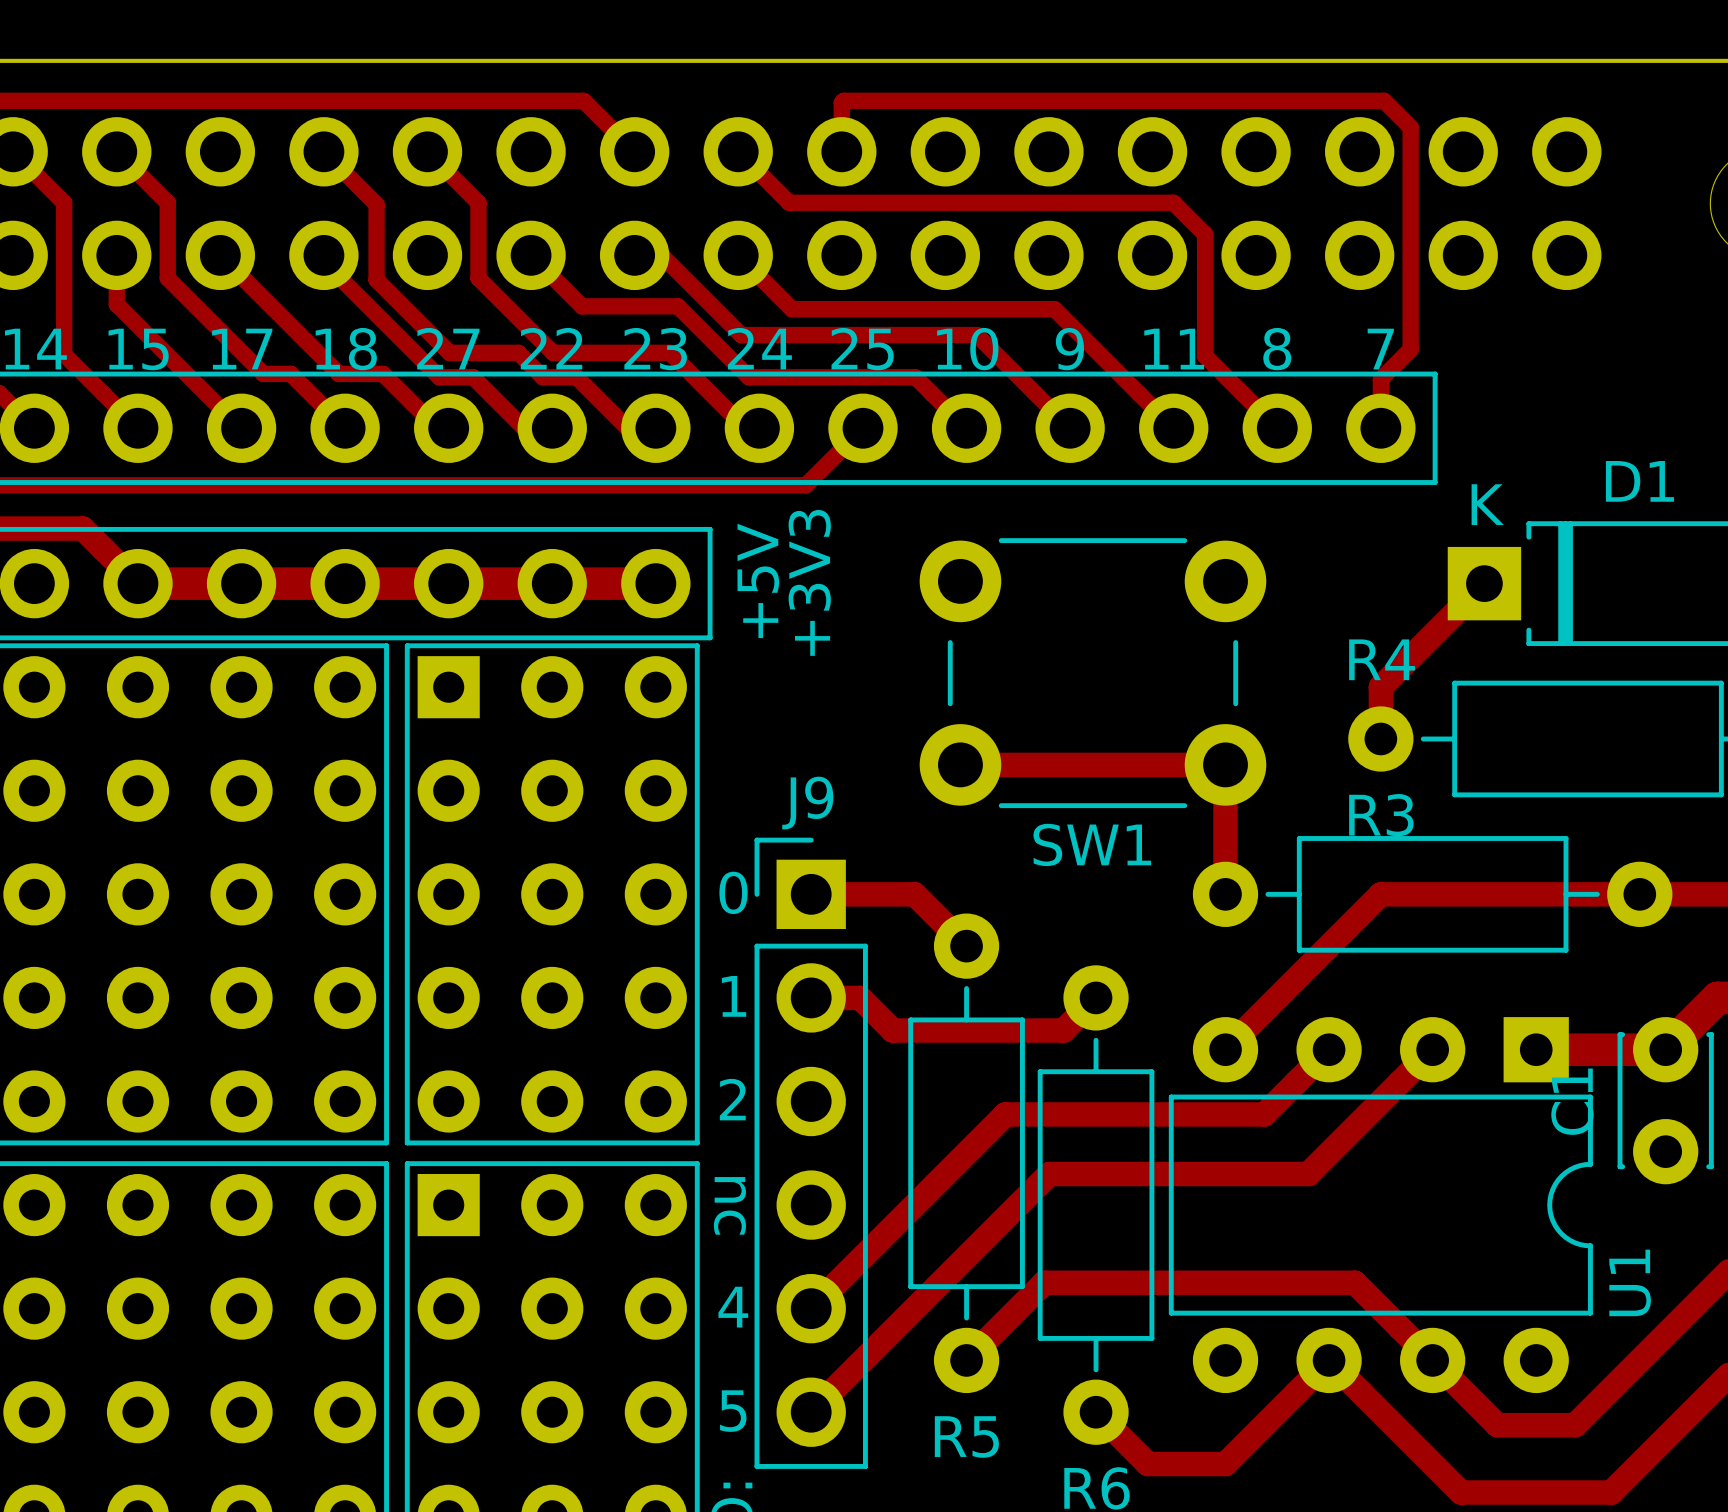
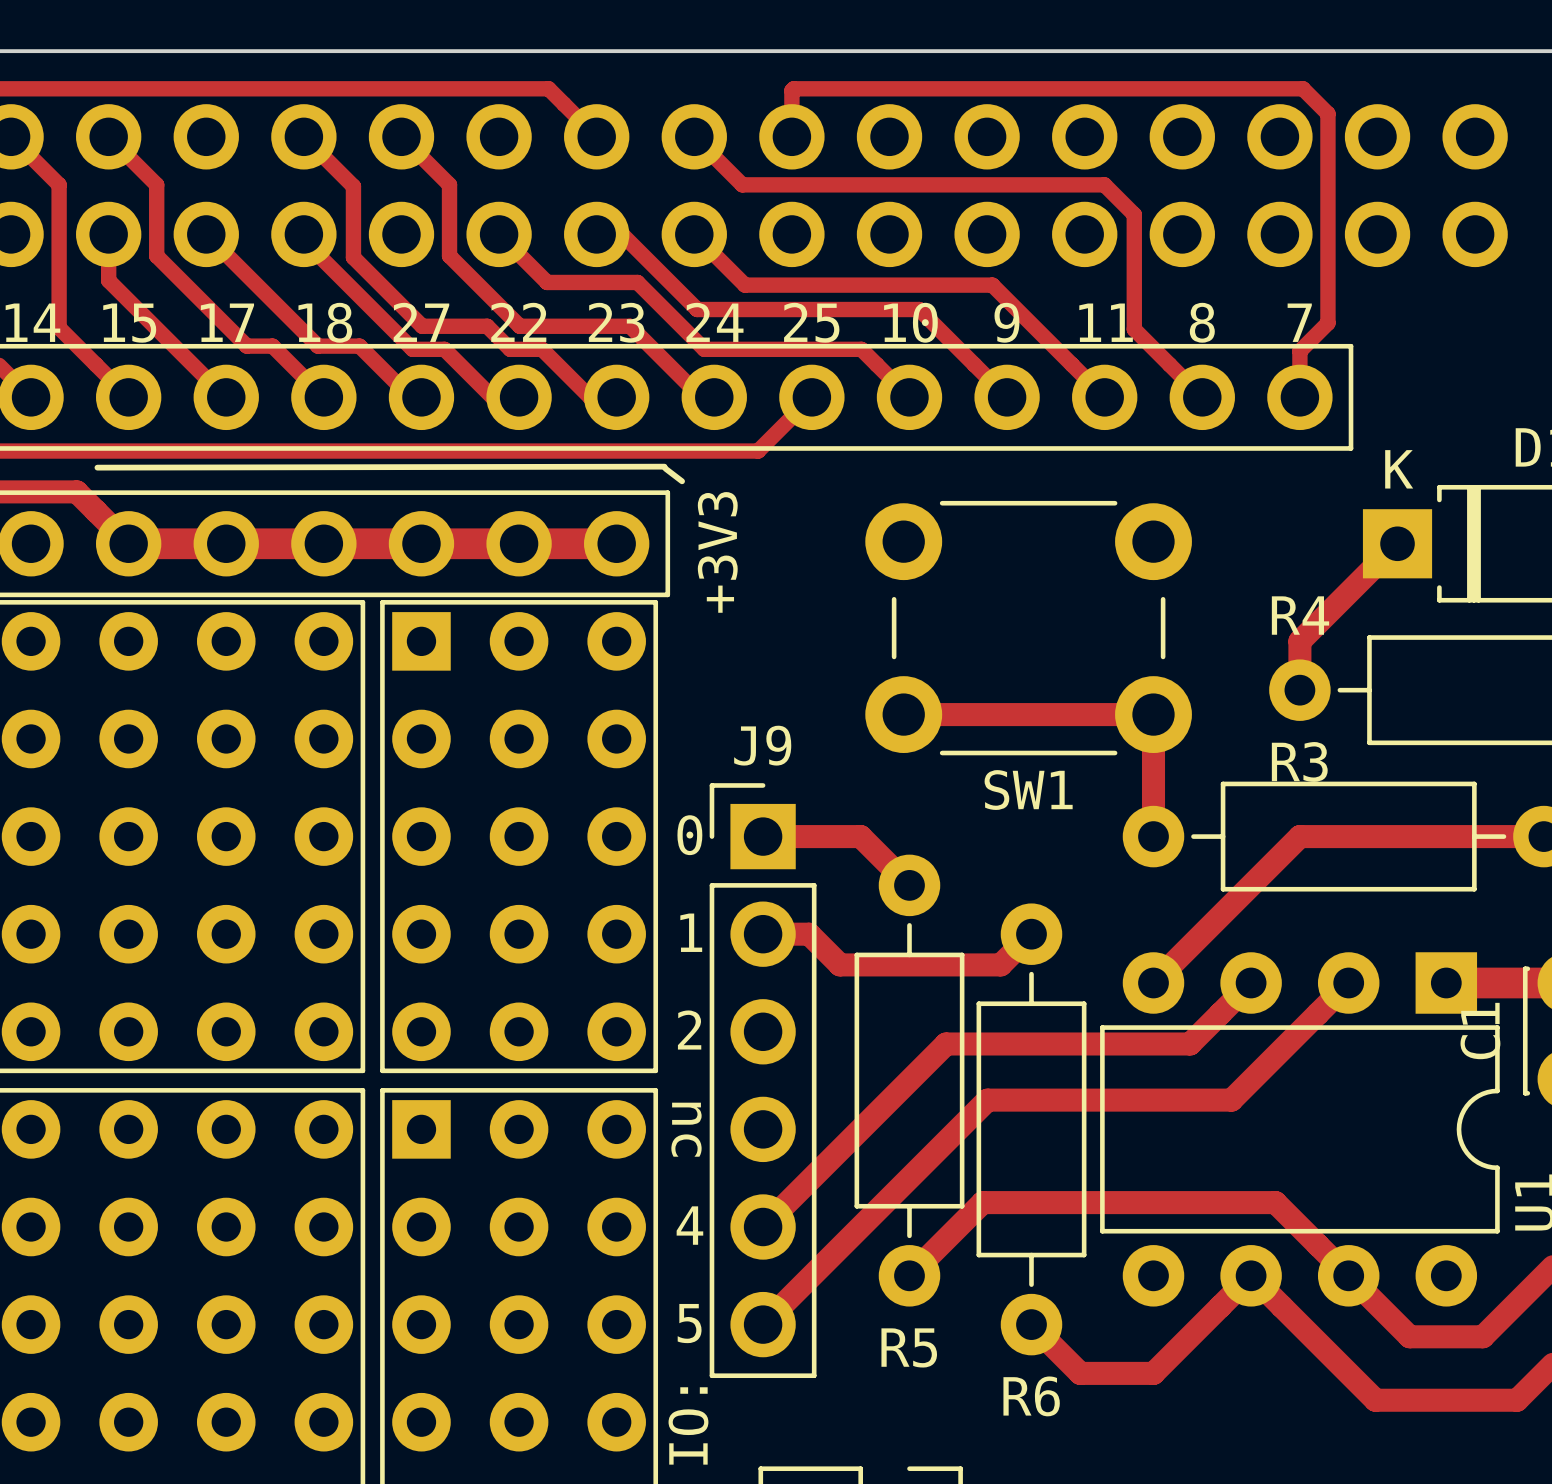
line: none -> (664, 466) (97, 467)
line: none -> (665, 468) (682, 481)
text: +5V (758, 580) -> +3V3 (717, 552)
text: +3V3 (809, 582) -> none

